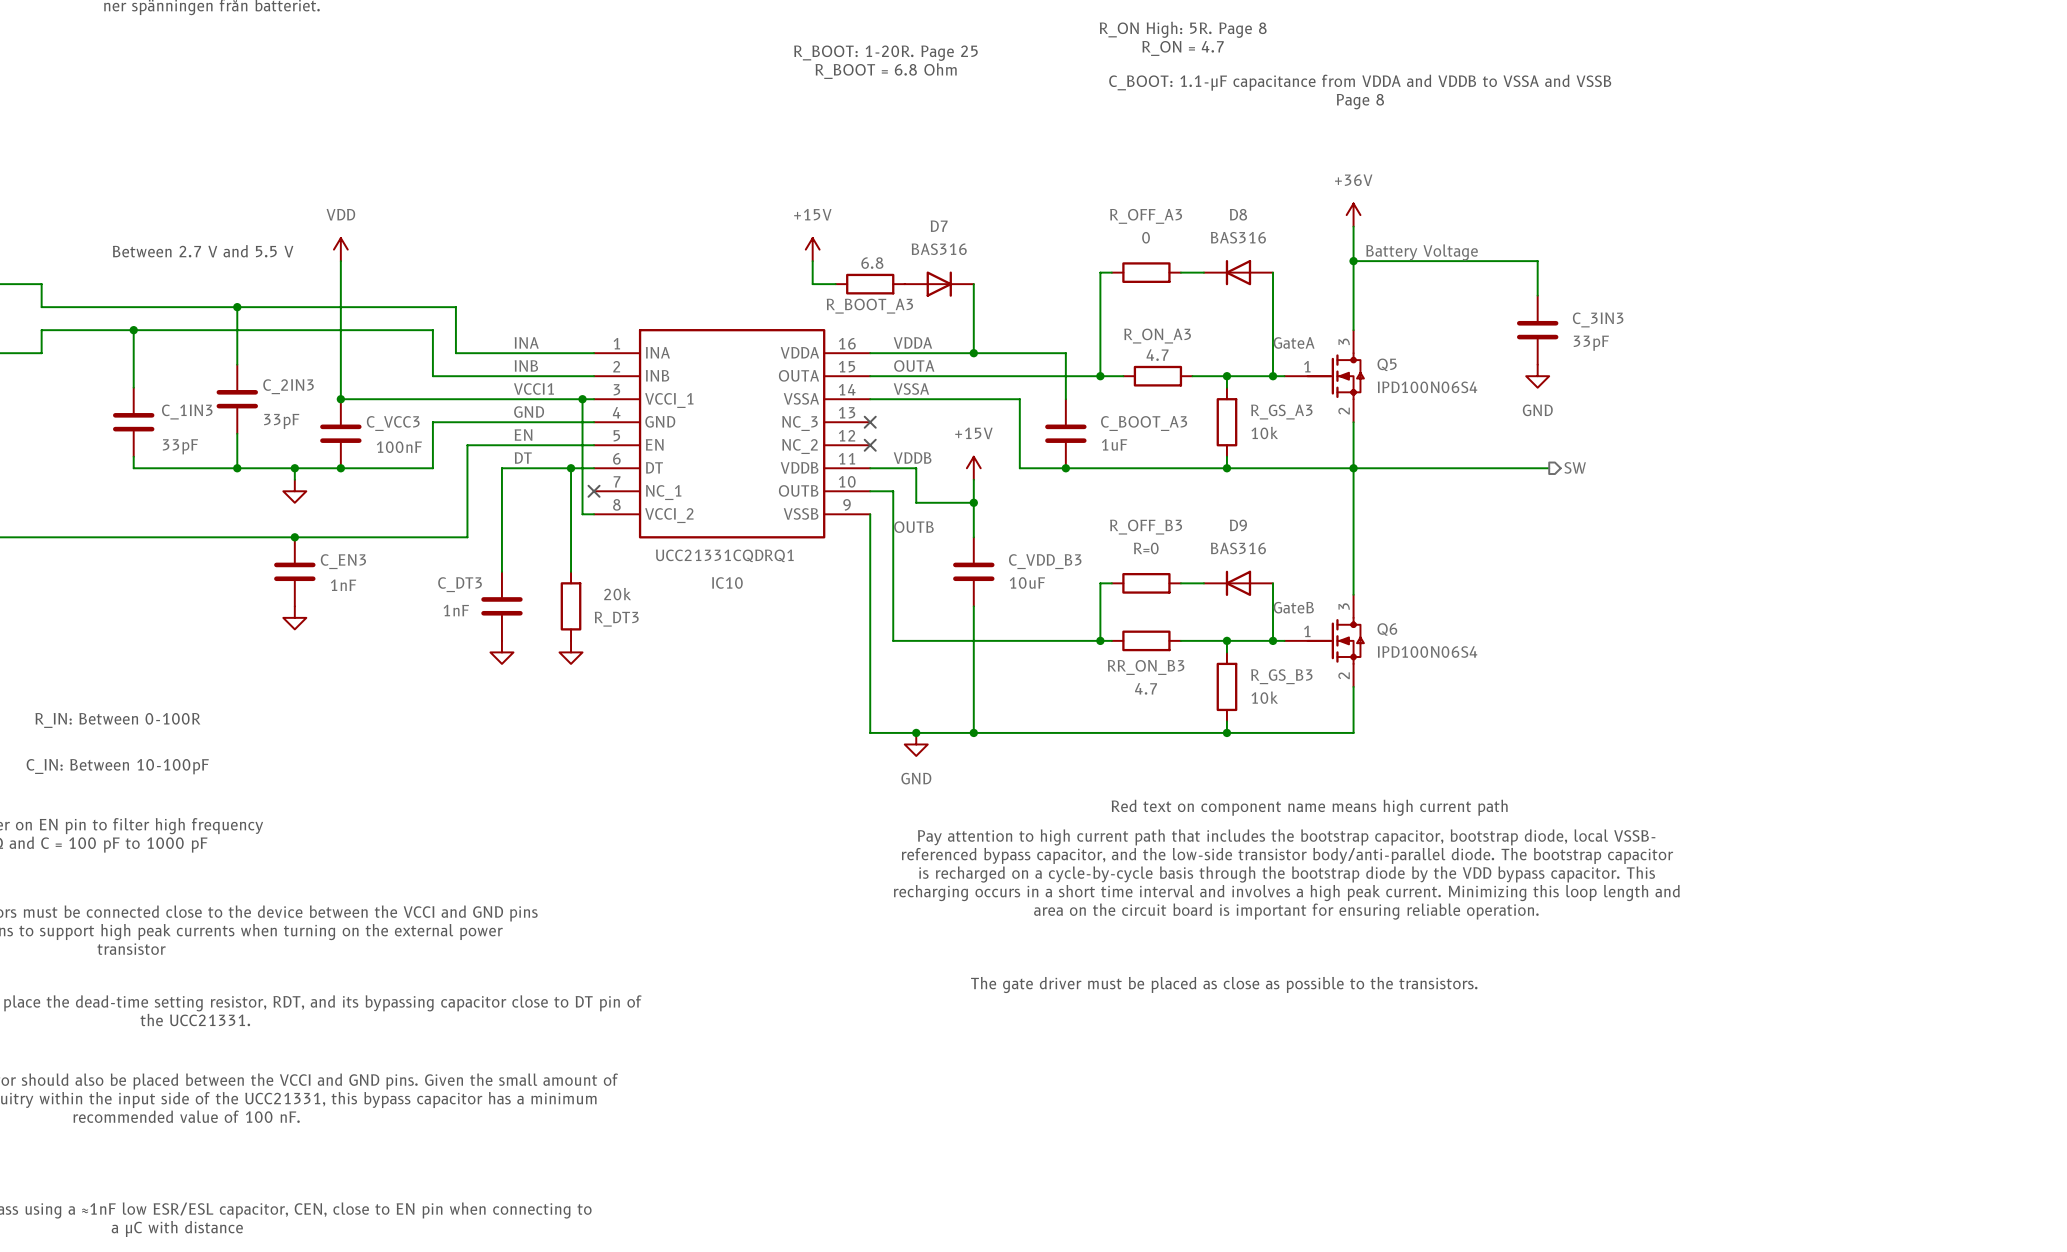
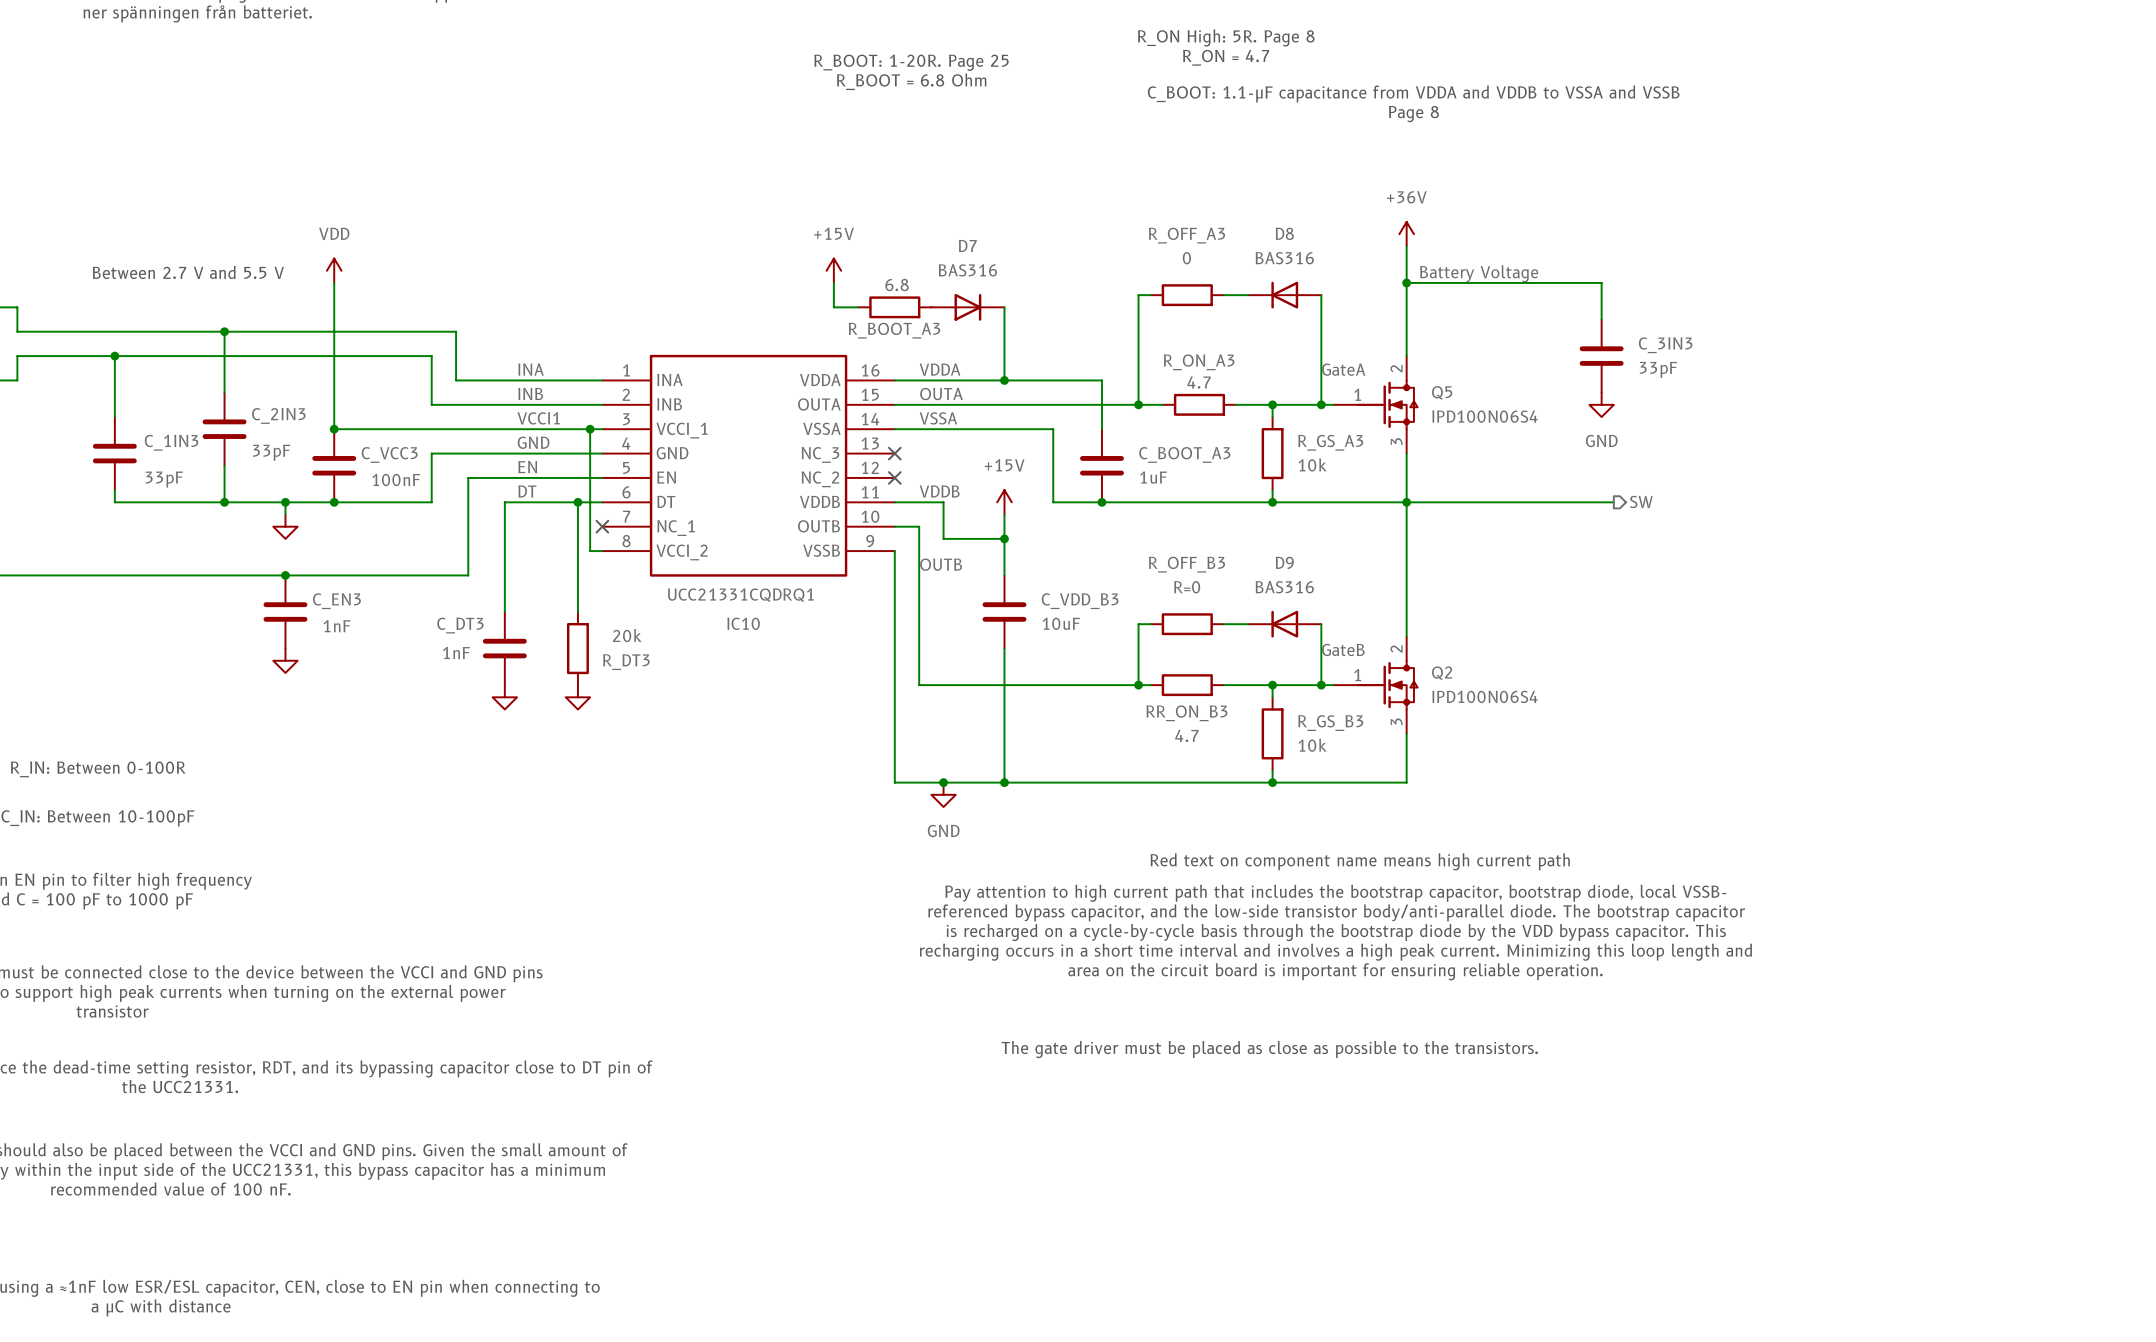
Q5 pin number: 3 (1344, 341) -> 2 (1396, 368)
Q5 pin number: 2 (1344, 411) -> 3 (1396, 441)
Q6 pin number: 3 (1344, 606) -> 2 (1396, 648)
Q6 name: Q6 (1387, 629) -> Q2 (1442, 673)
Q6 pin number: 2 (1344, 675) -> 3 (1396, 721)

